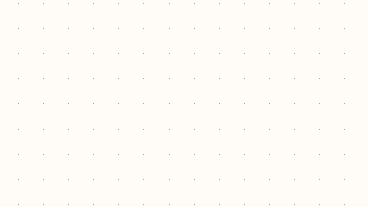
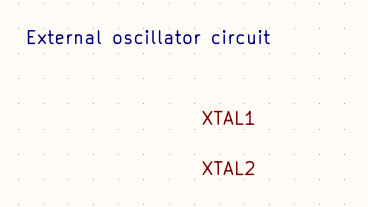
text: none -> External oscillator circuit (148, 37)
label: none -> XTAL1 (228, 117)
label: none -> XTAL2 (228, 168)

